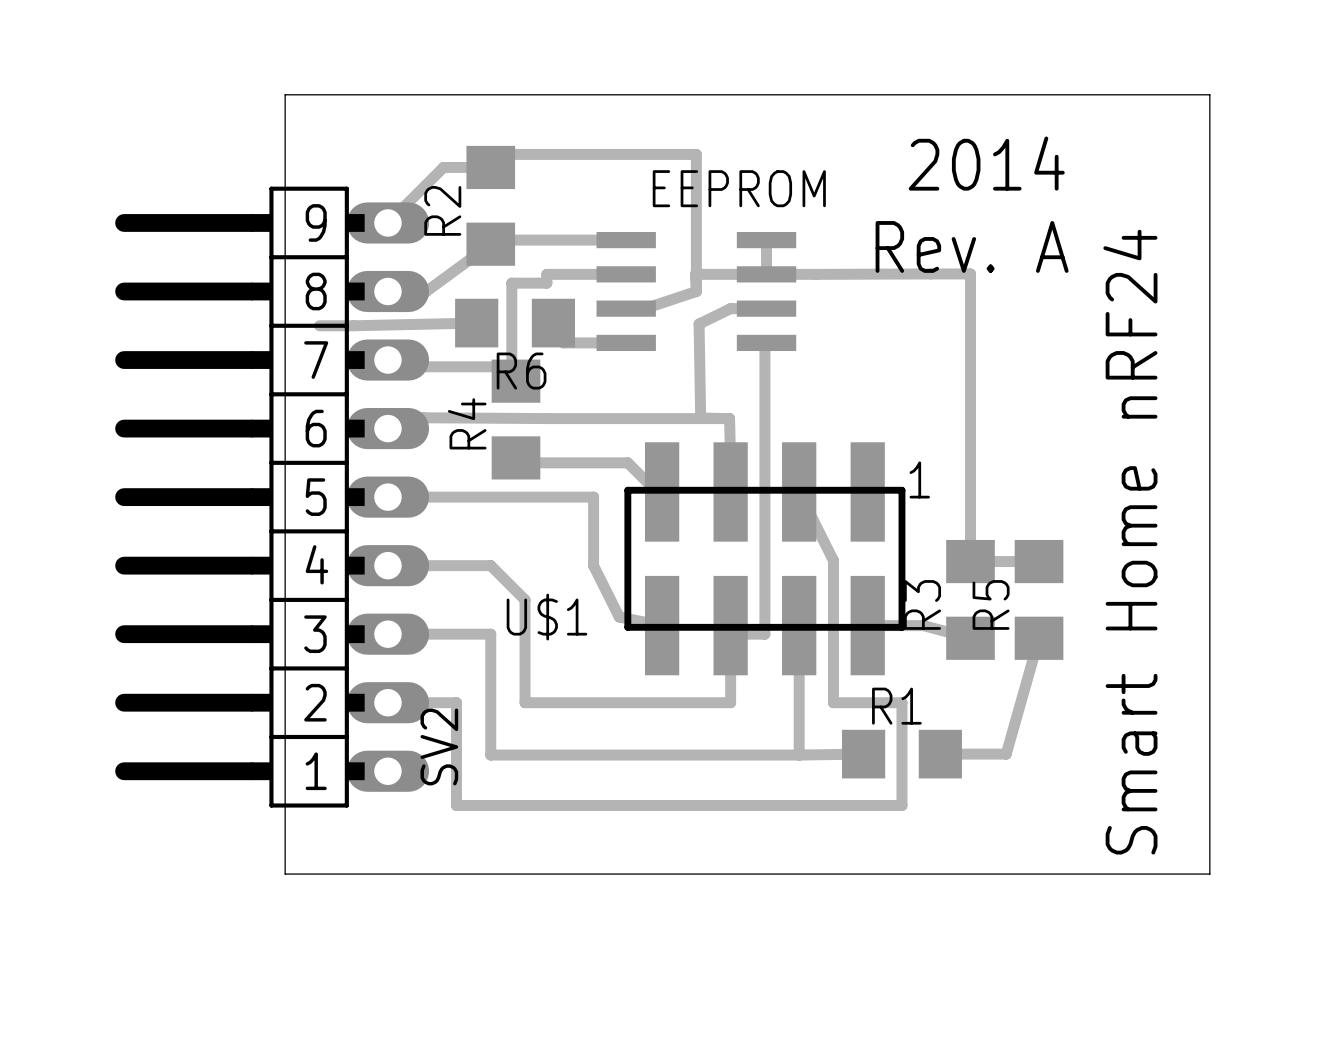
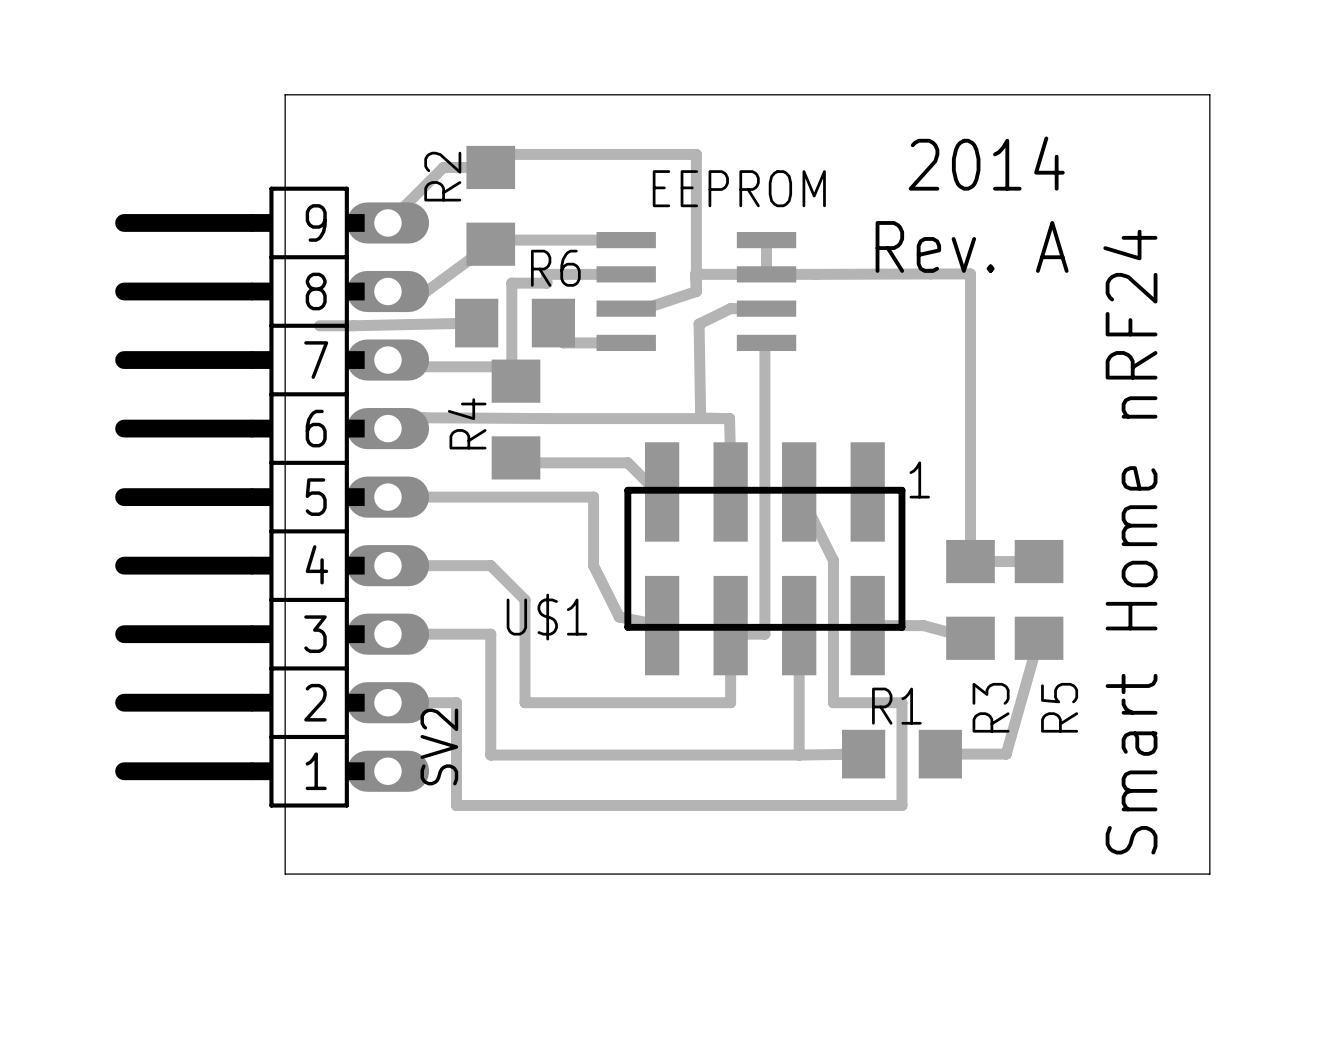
R2 name position: R2 (442, 210) -> R2 (442, 176)
R6 name position: R6 (521, 371) -> R6 (555, 268)
R3 name position: R3 (922, 604) -> R3 (991, 707)
R5 name position: R5 (991, 604) -> R5 (1059, 707)

